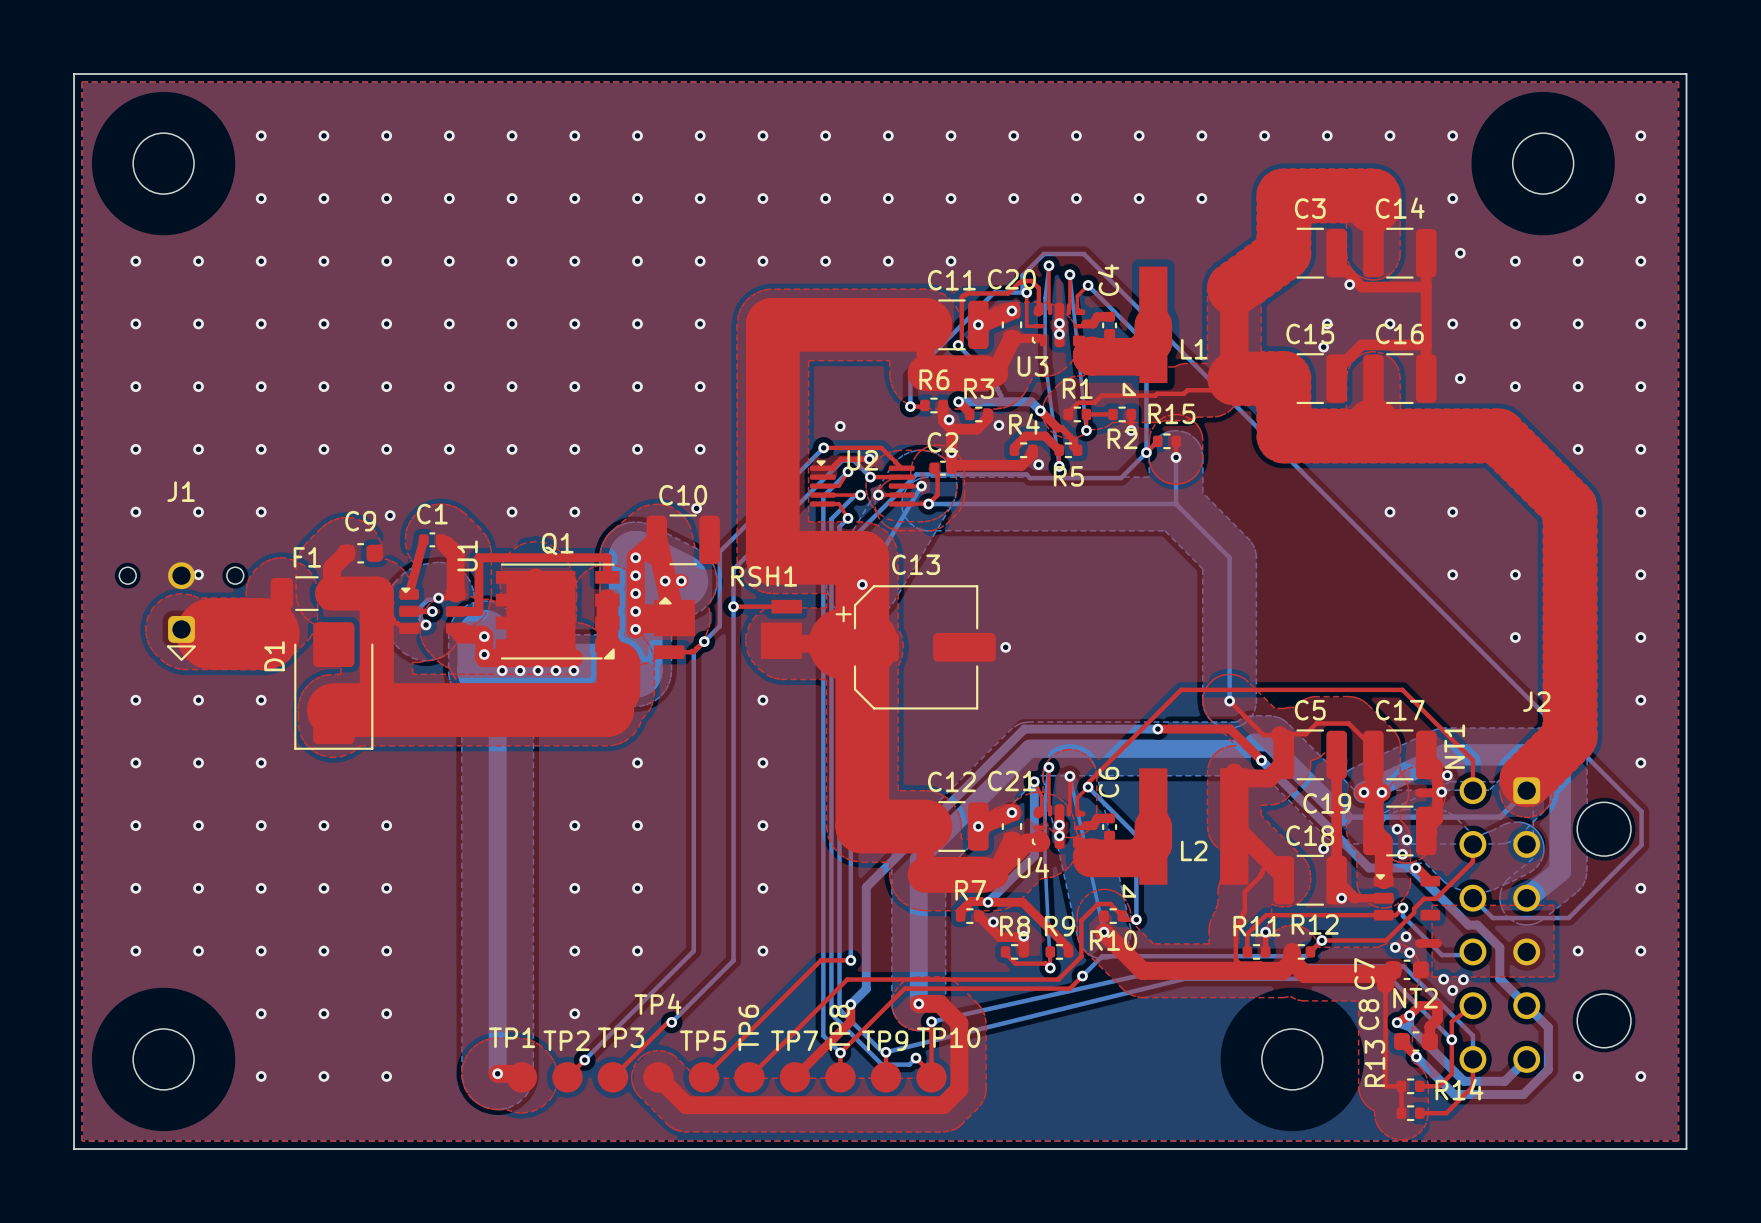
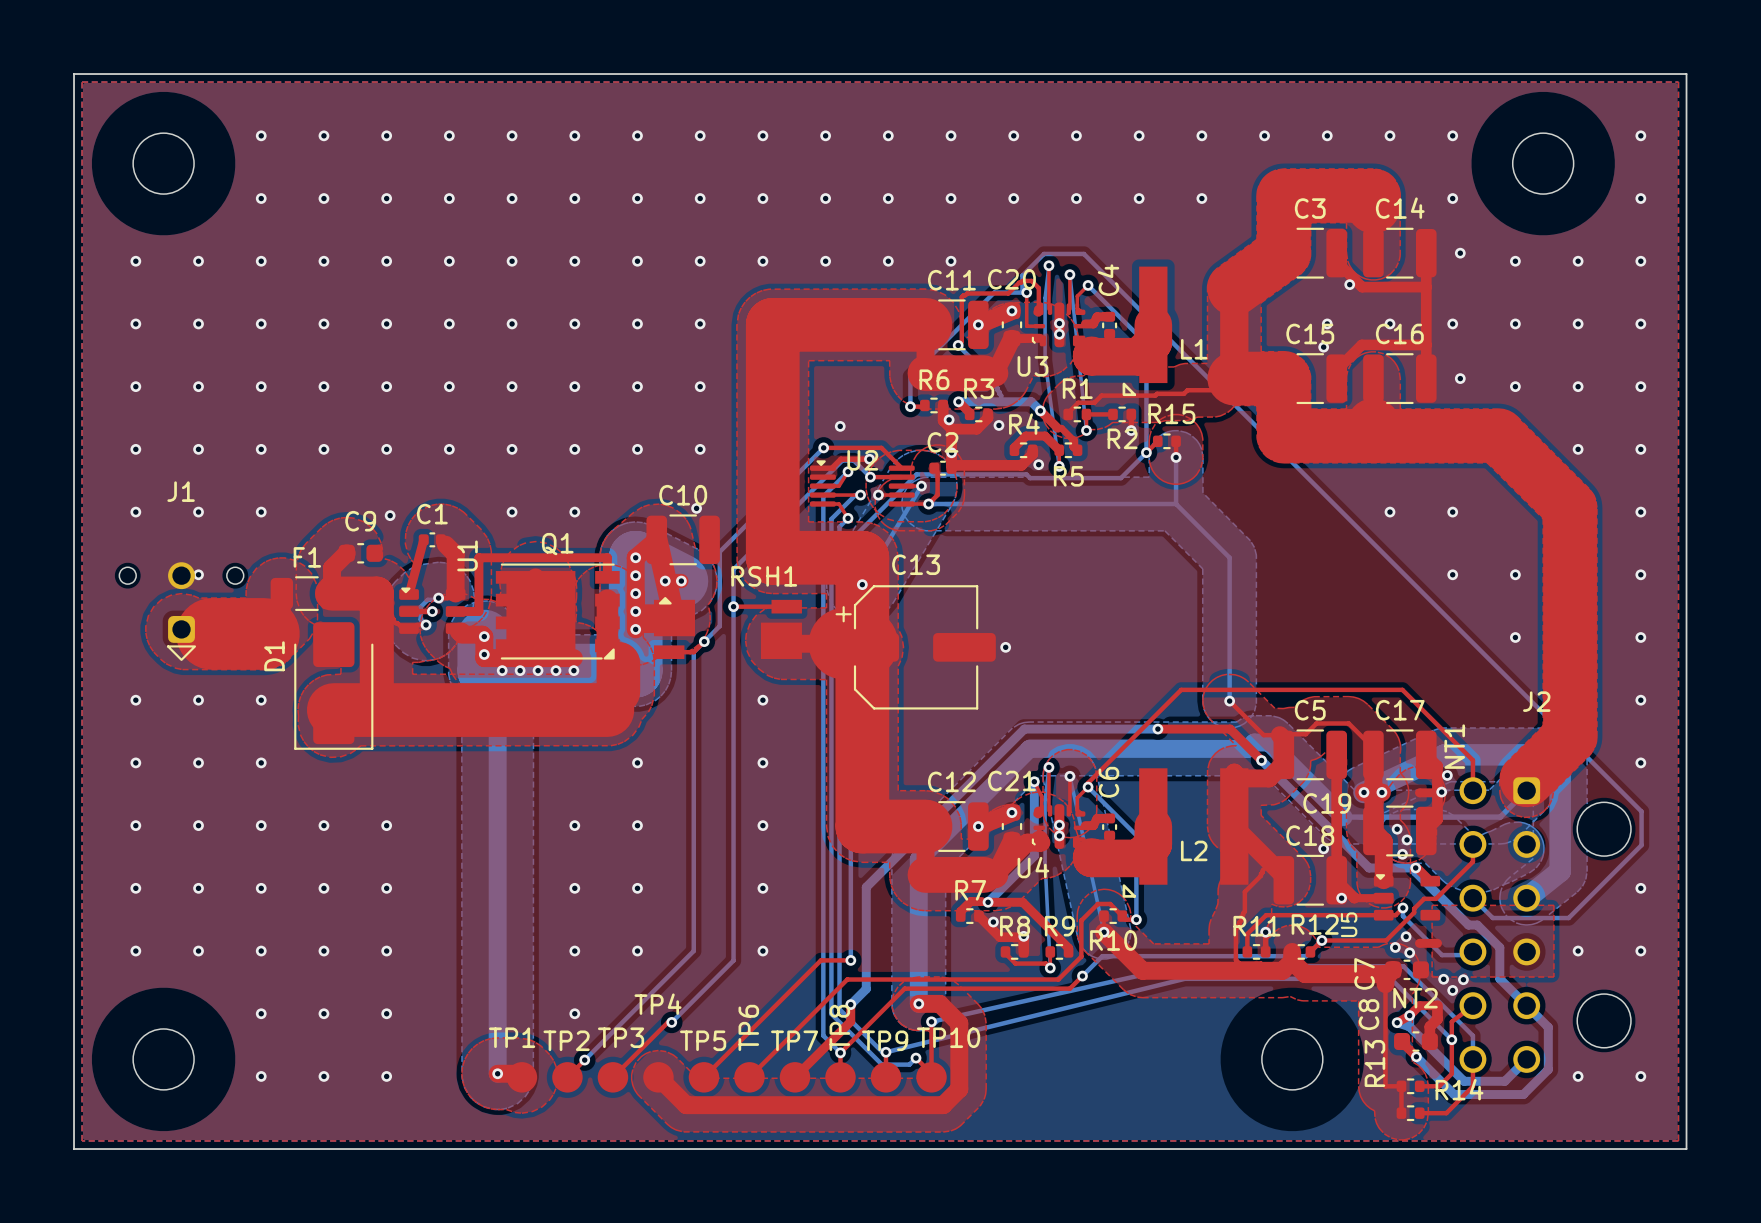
U5 name: none -> U5 (1349, 924)

